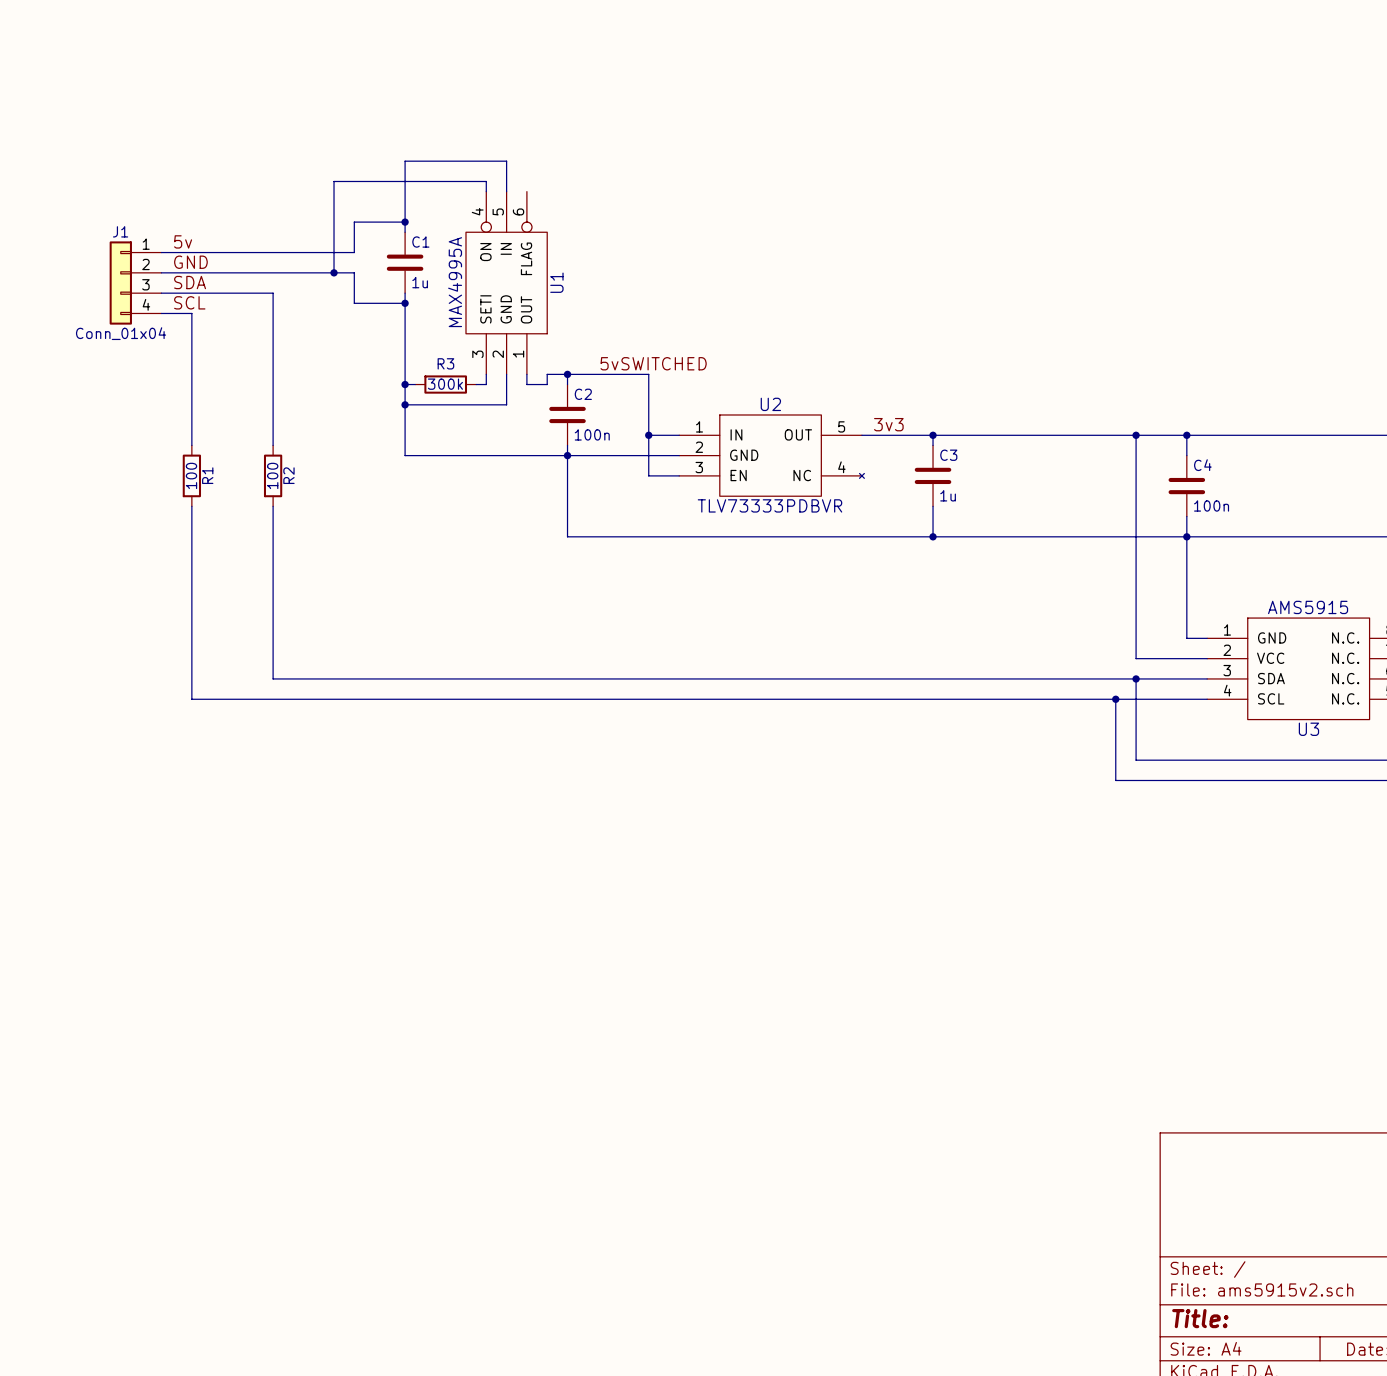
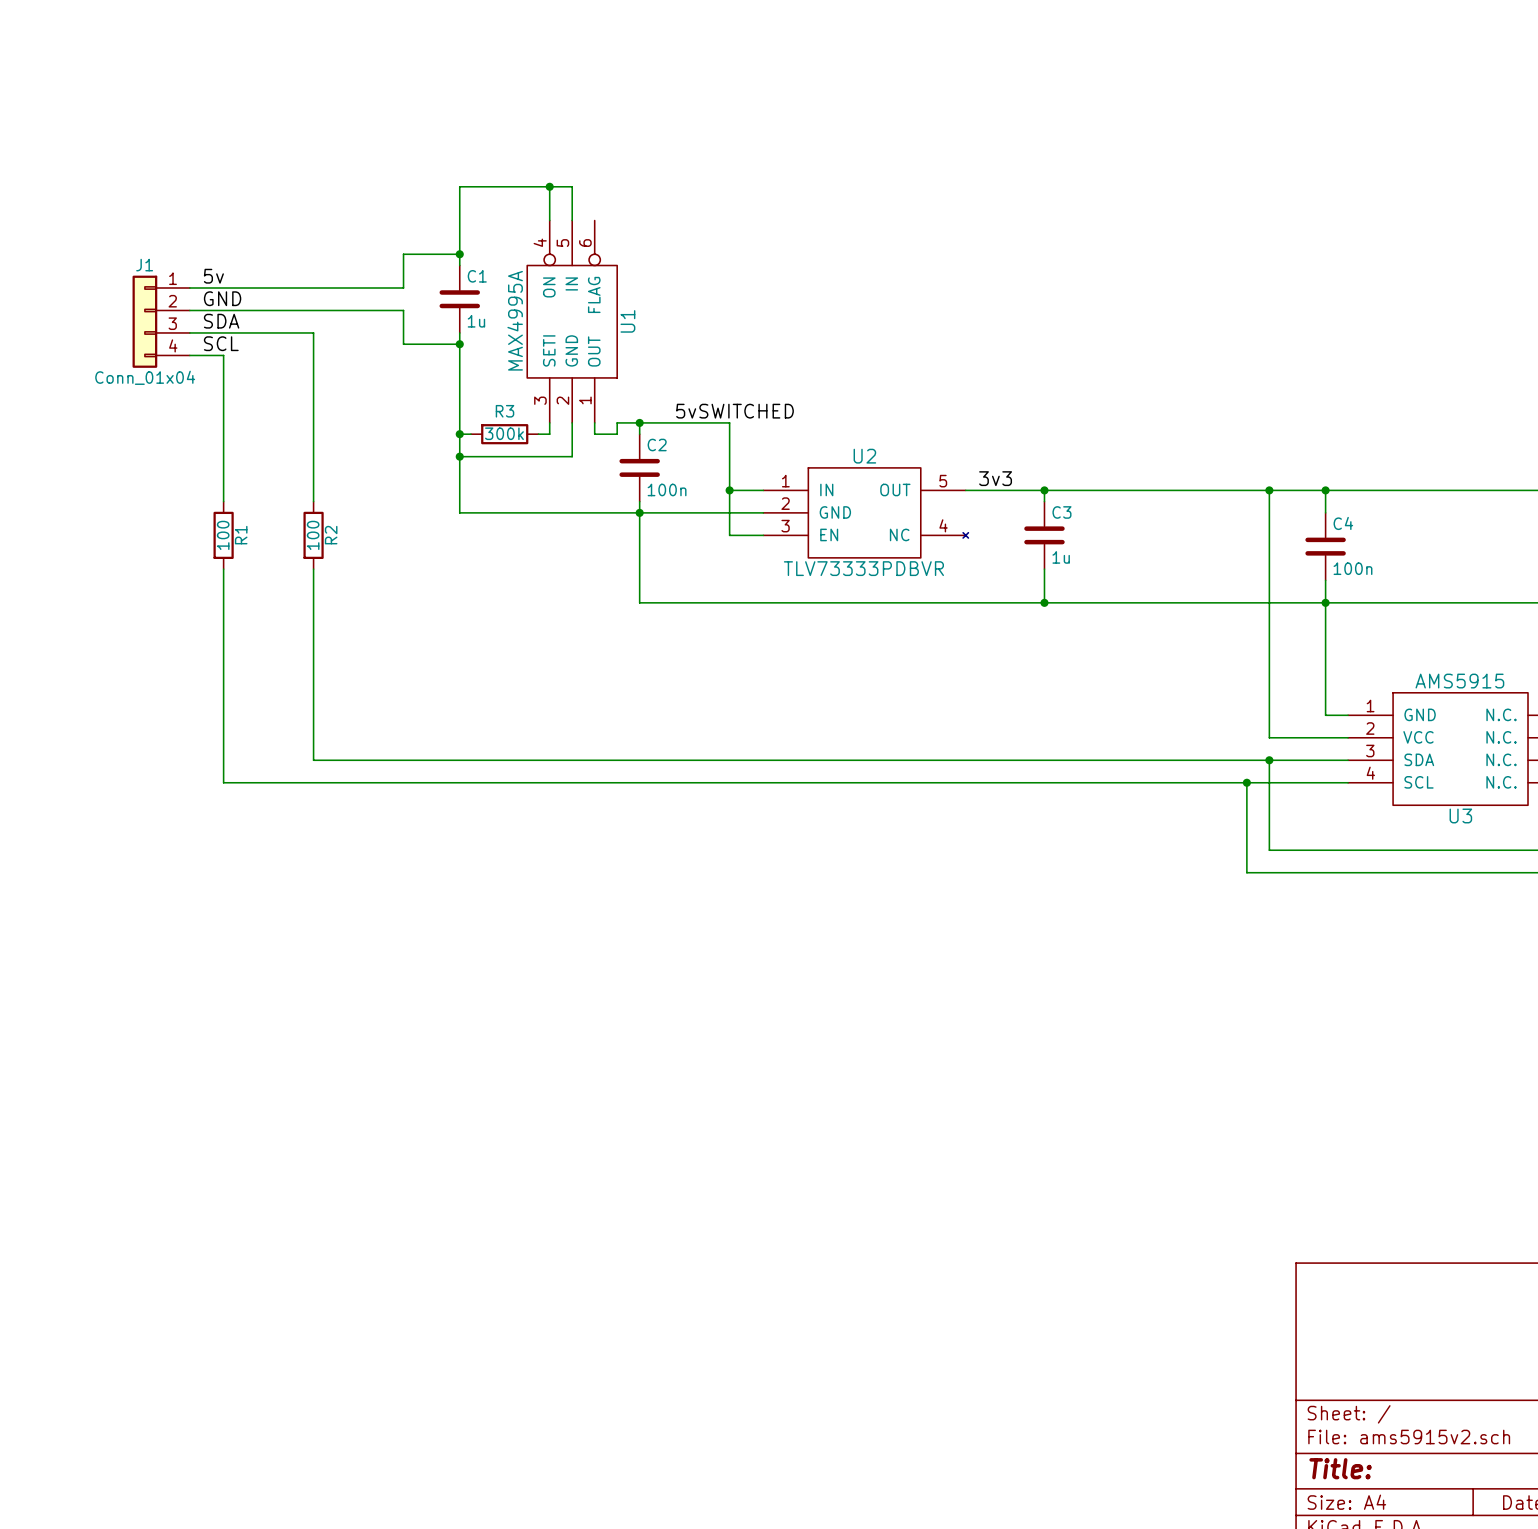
junction: none -> (549, 186)
wire: (486, 181) (334, 181) (334, 272) -> (549, 209) (549, 186)
junction: (334, 272) -> none

